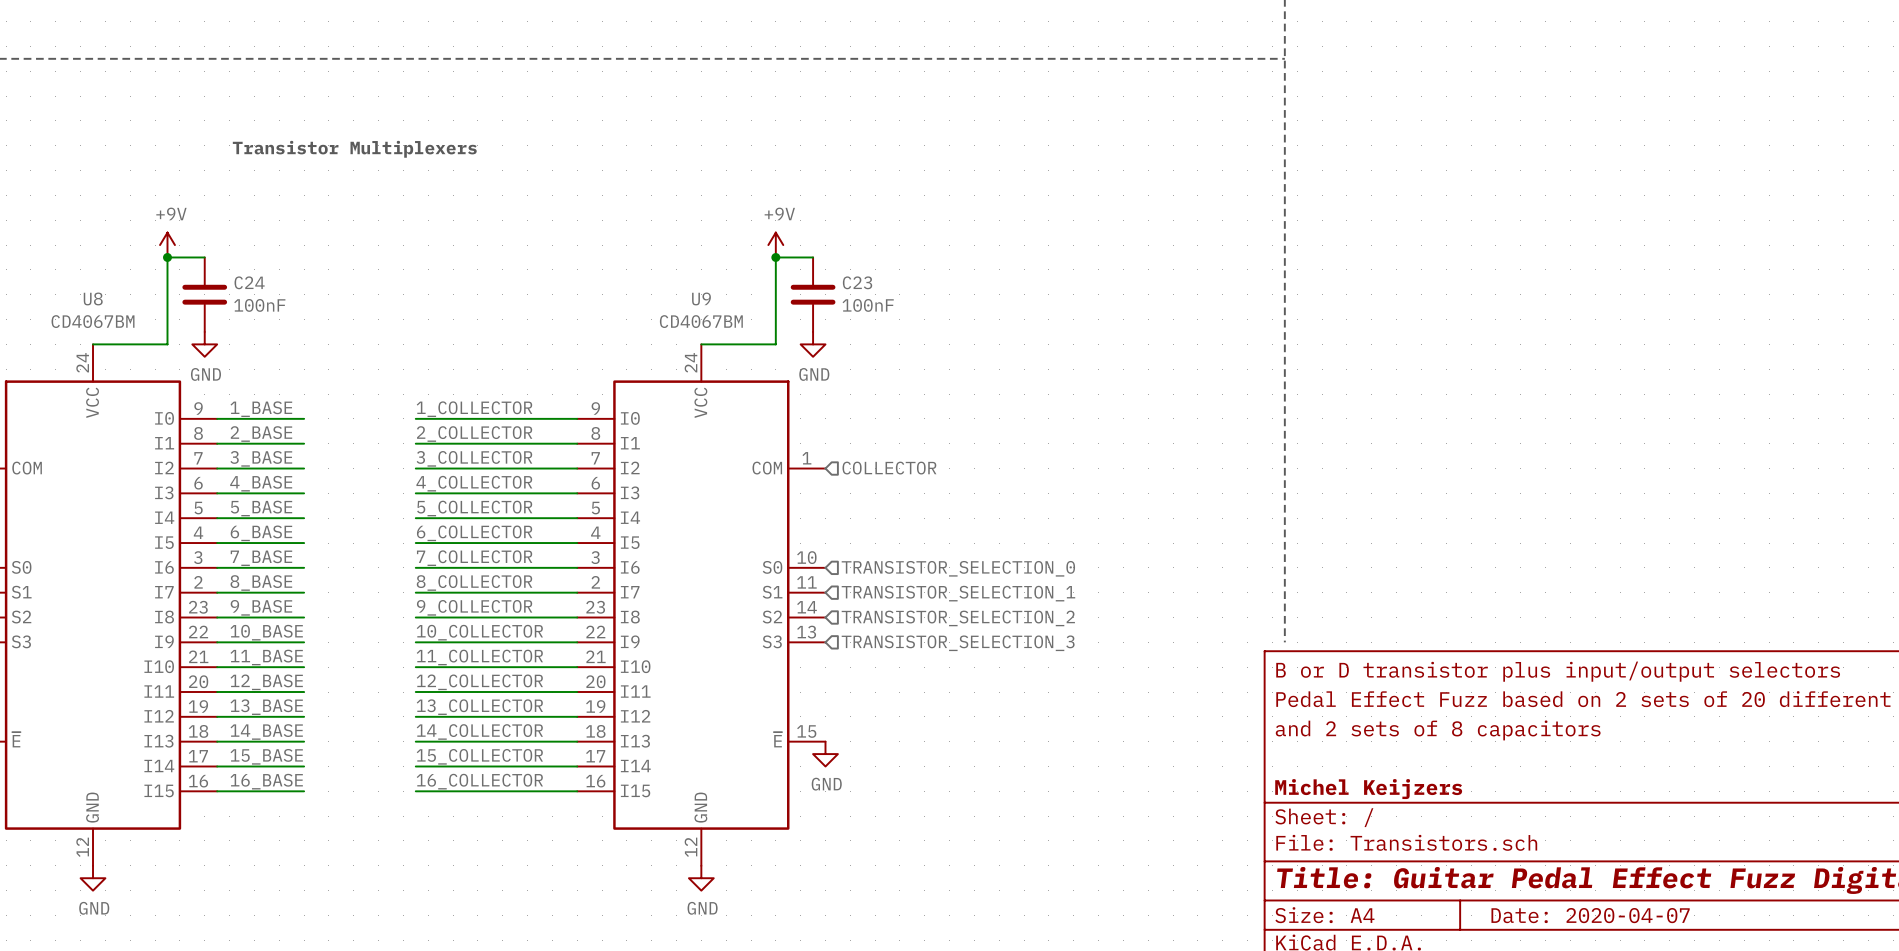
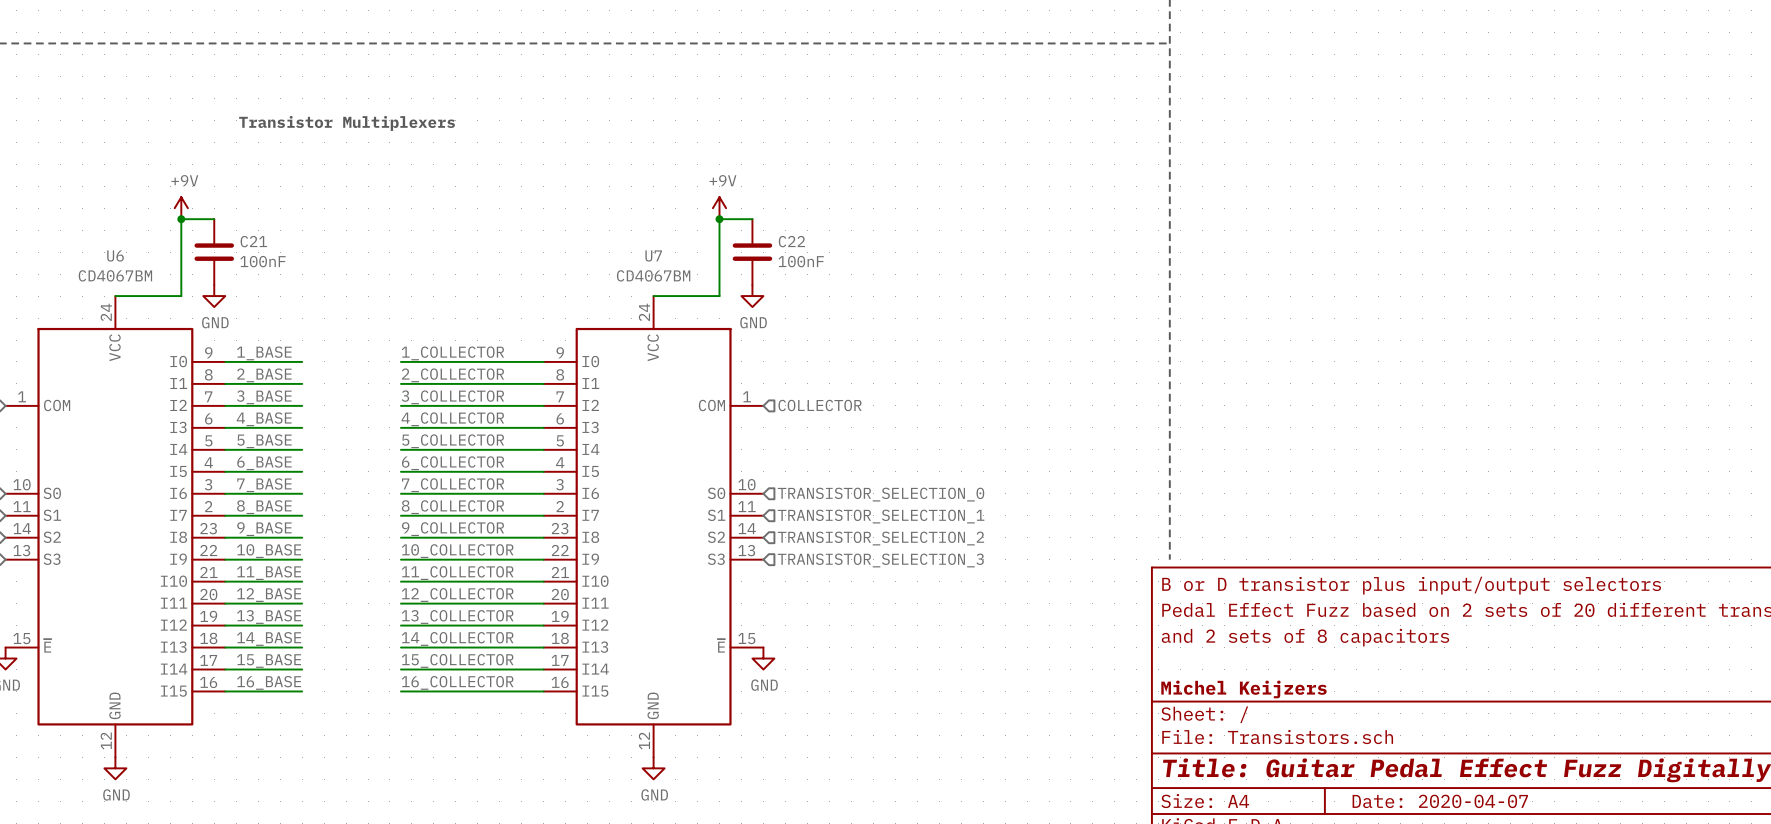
C24 name: C24 (249, 282) -> C21 (253, 241)
C23 name: C23 (857, 282) -> C22 (791, 241)
U8 name: U8 (93, 298) -> U6 (115, 255)
U9 name: U9 (701, 298) -> U7 (653, 255)

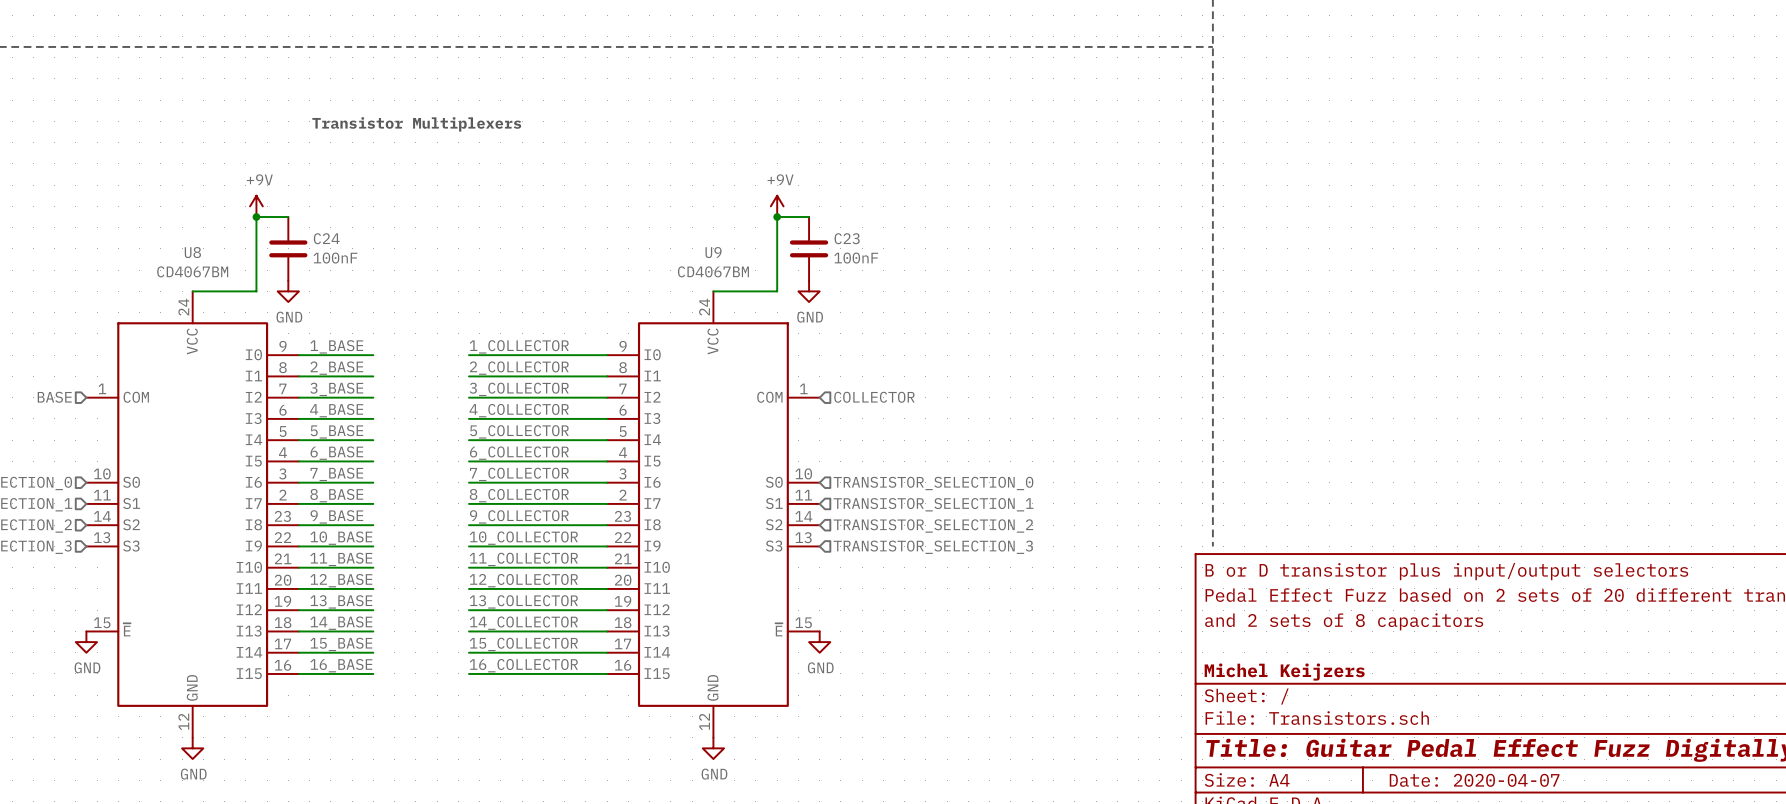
C21 name: C21 (253, 241) -> C24 (326, 238)
C22 name: C22 (791, 241) -> C23 (847, 238)
U6 name: U6 (115, 255) -> U8 (192, 252)
U7 name: U7 (653, 255) -> U9 (713, 252)

